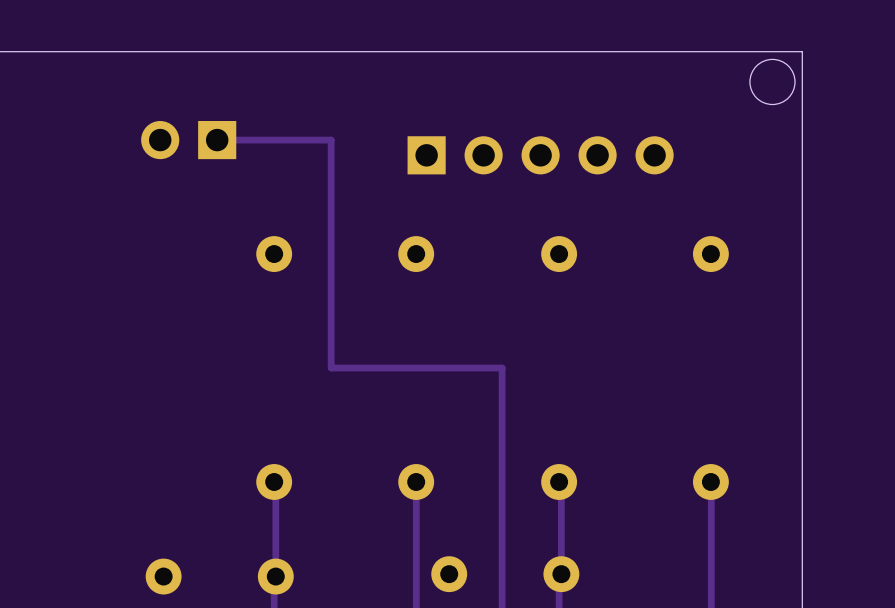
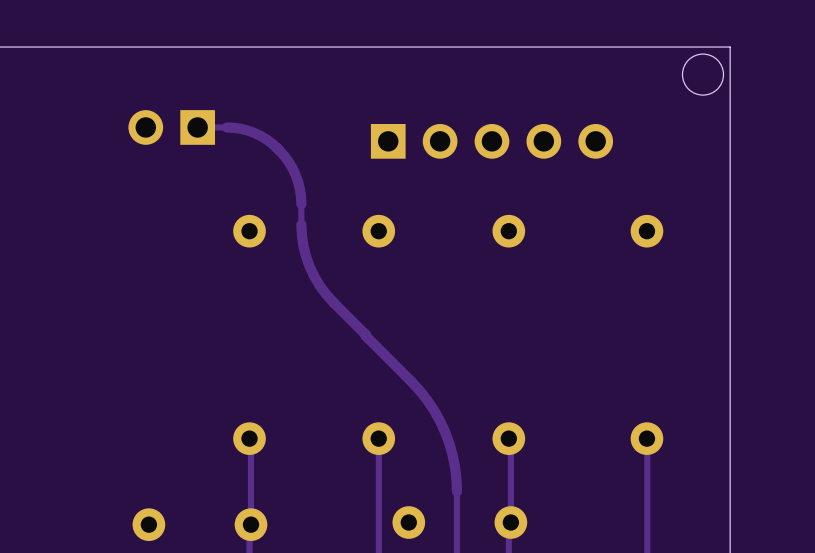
track: (249, 140) (331, 140) (331, 224) -> (227, 127) (254, 132) (266, 139) (278, 149) (295, 174) (301, 204)
track: (331, 246) (331, 368) (502, 368) (502, 540) -> (301, 224) (306, 256) (319, 285) (333, 302) (419, 390) (434, 410) (445, 432) (452, 455) (456, 491)

